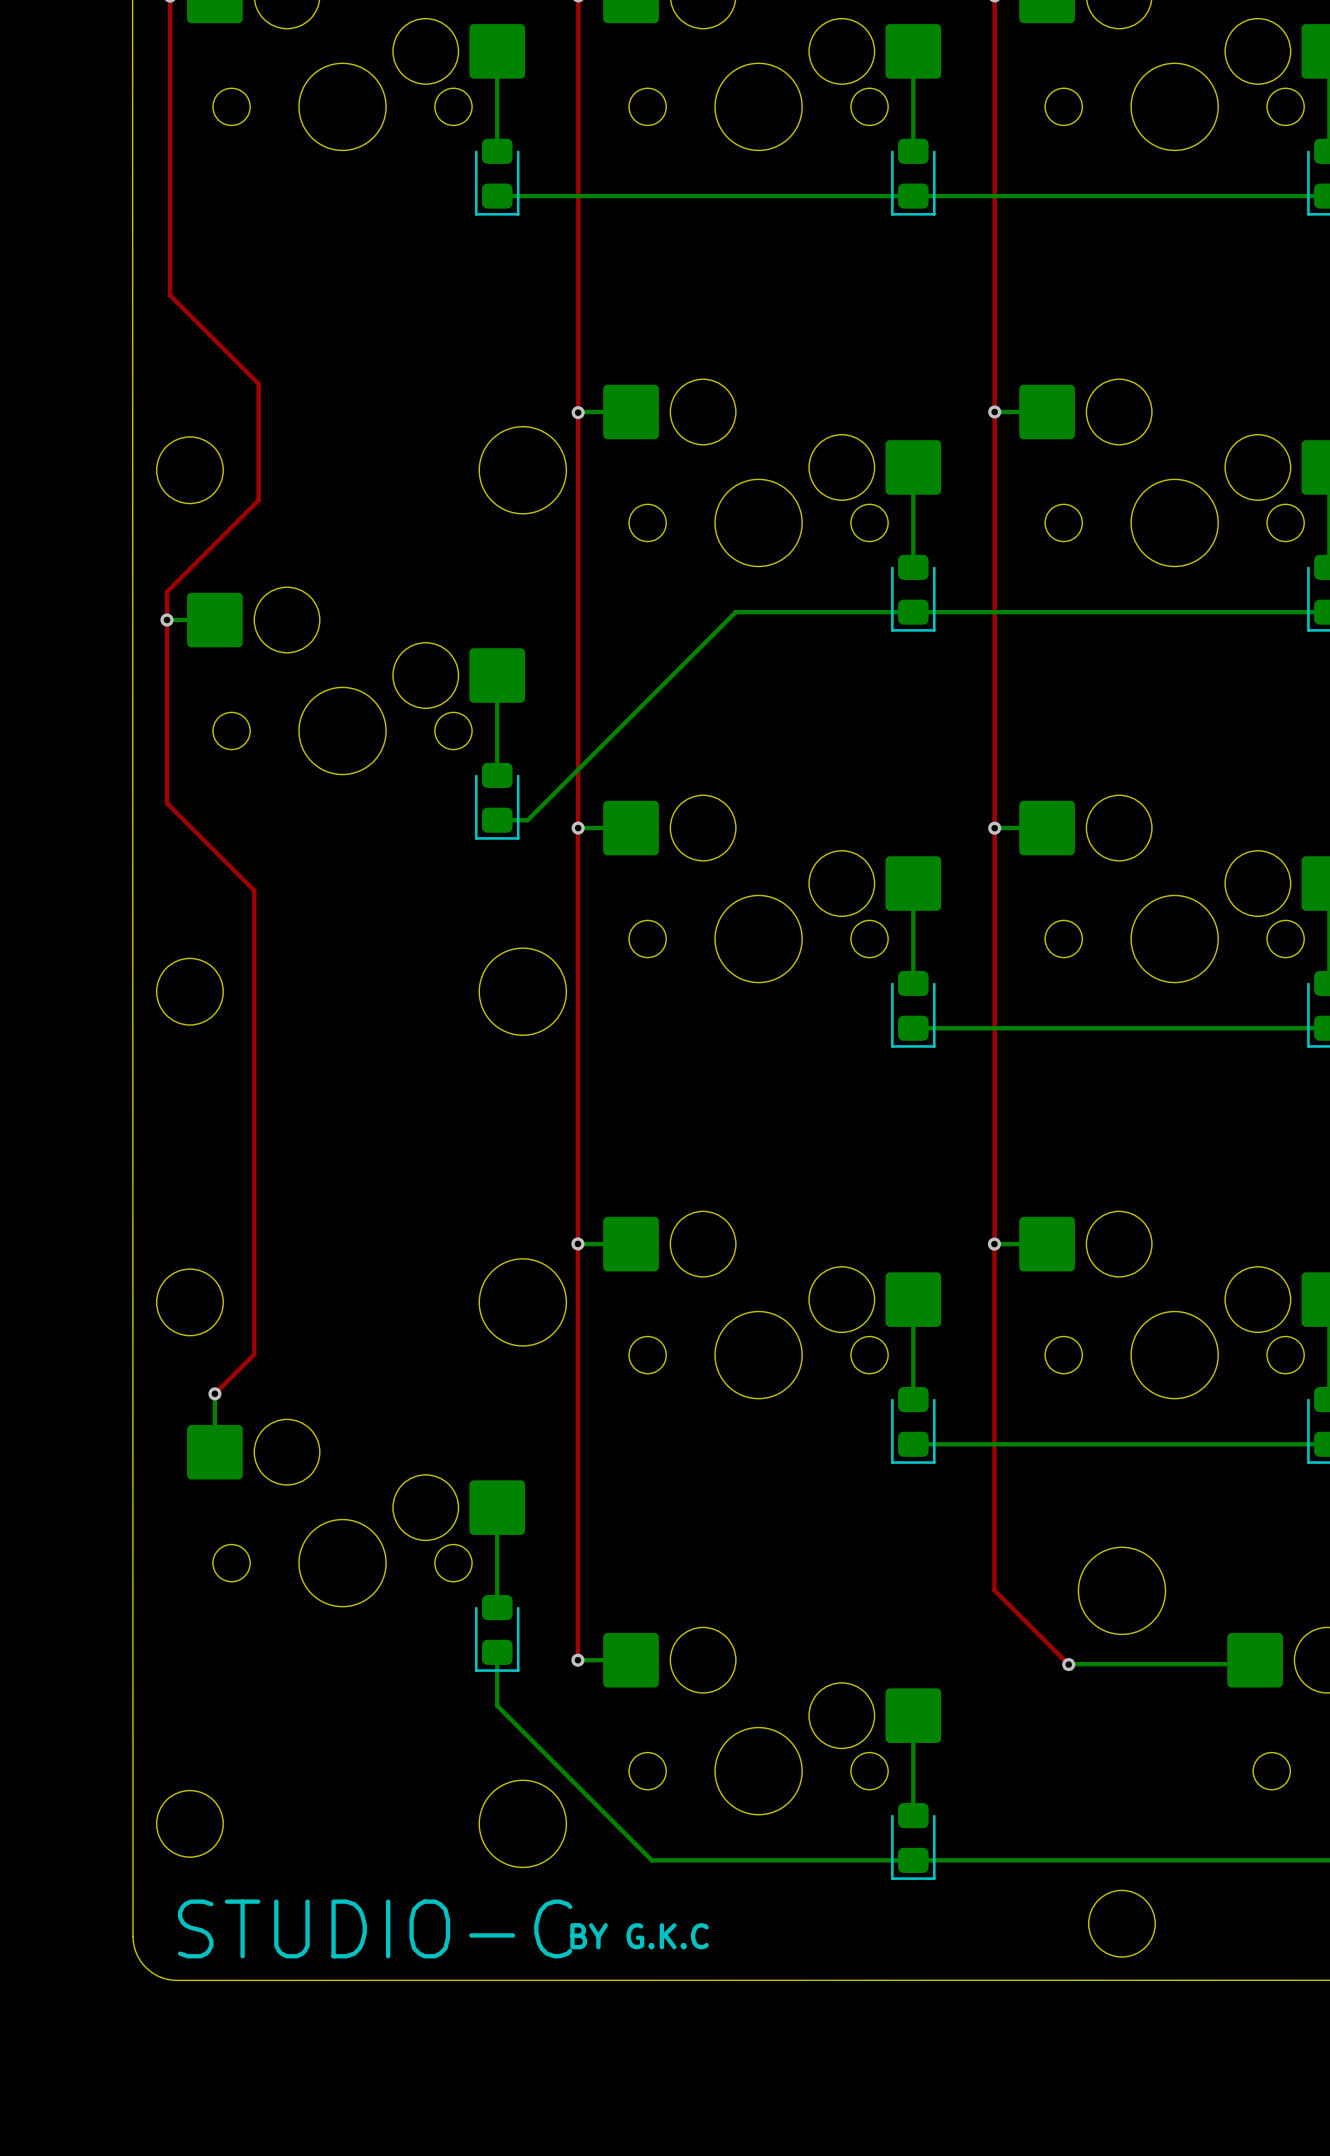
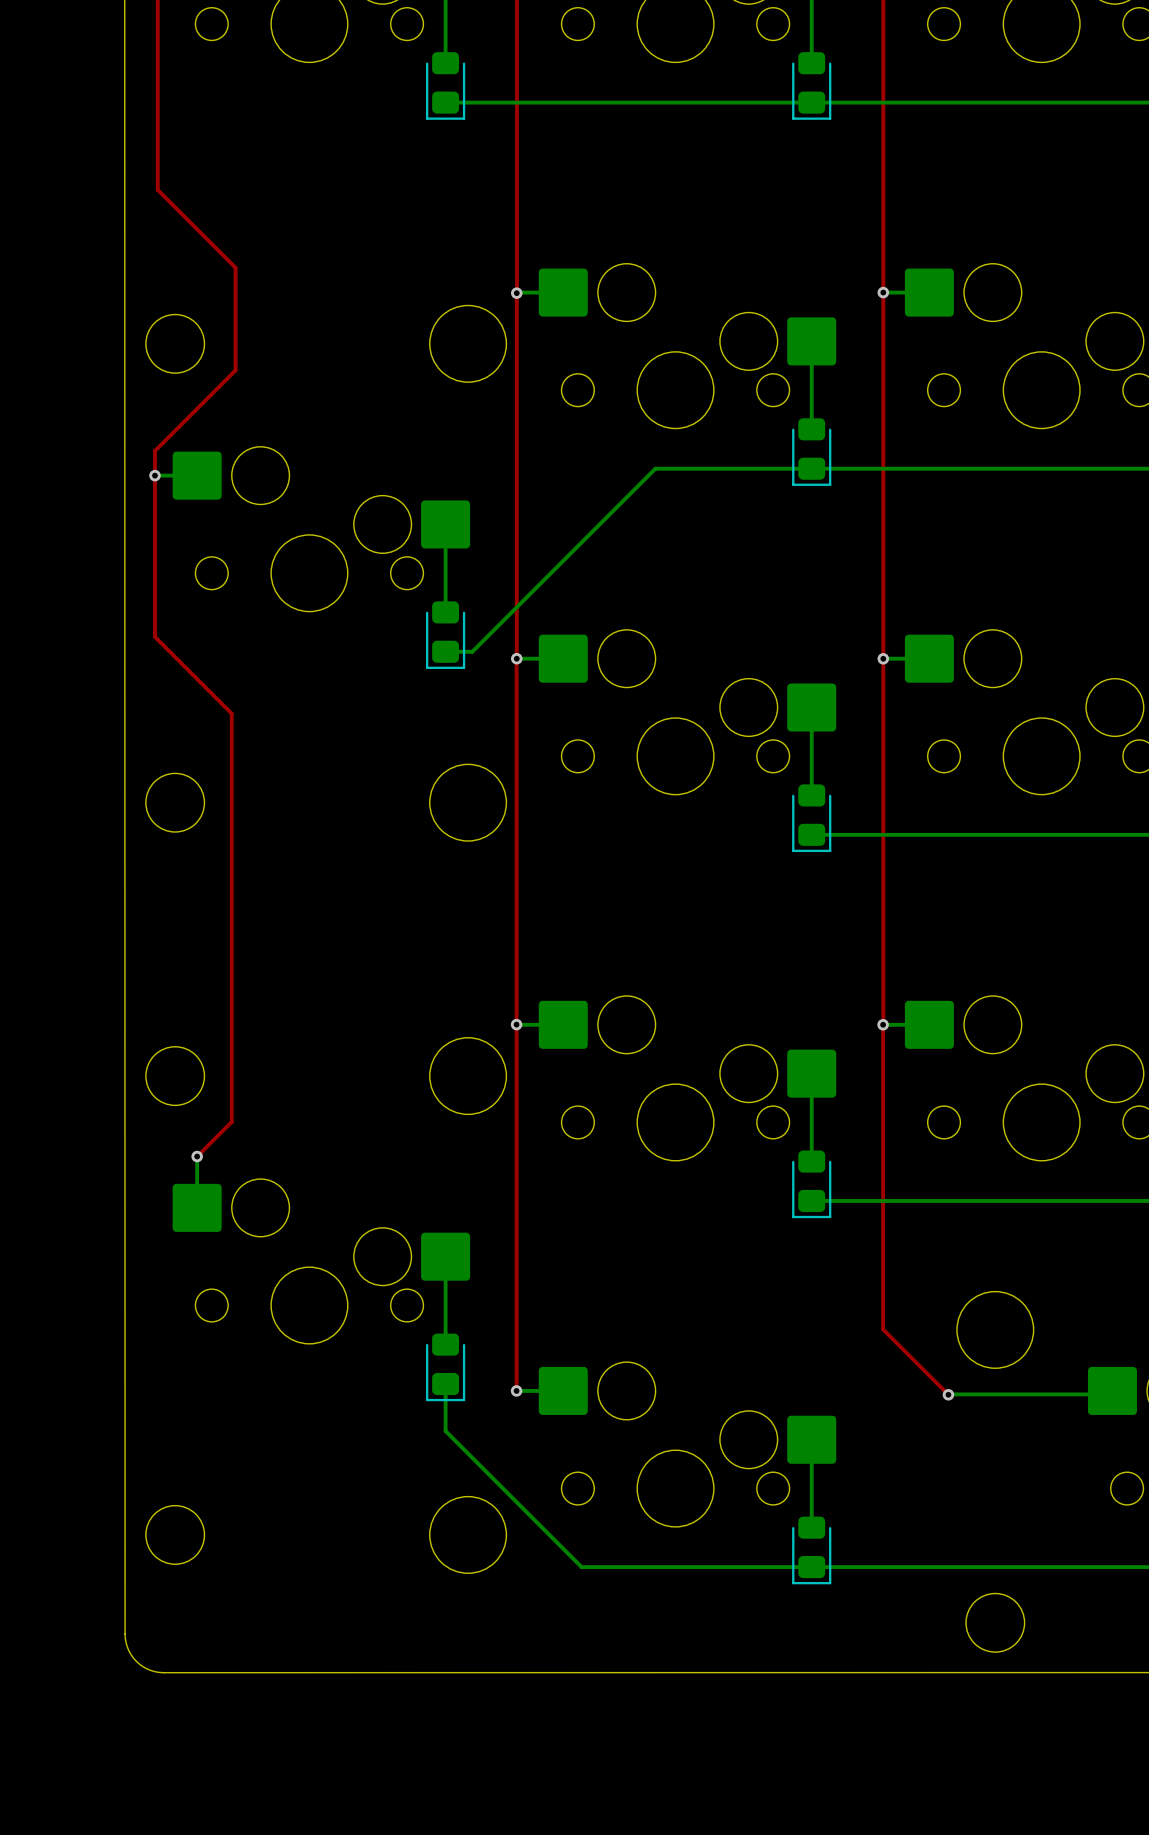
text: STUDIO-C (375, 1928) -> none
text: BY G.K.C (639, 1936) -> none

